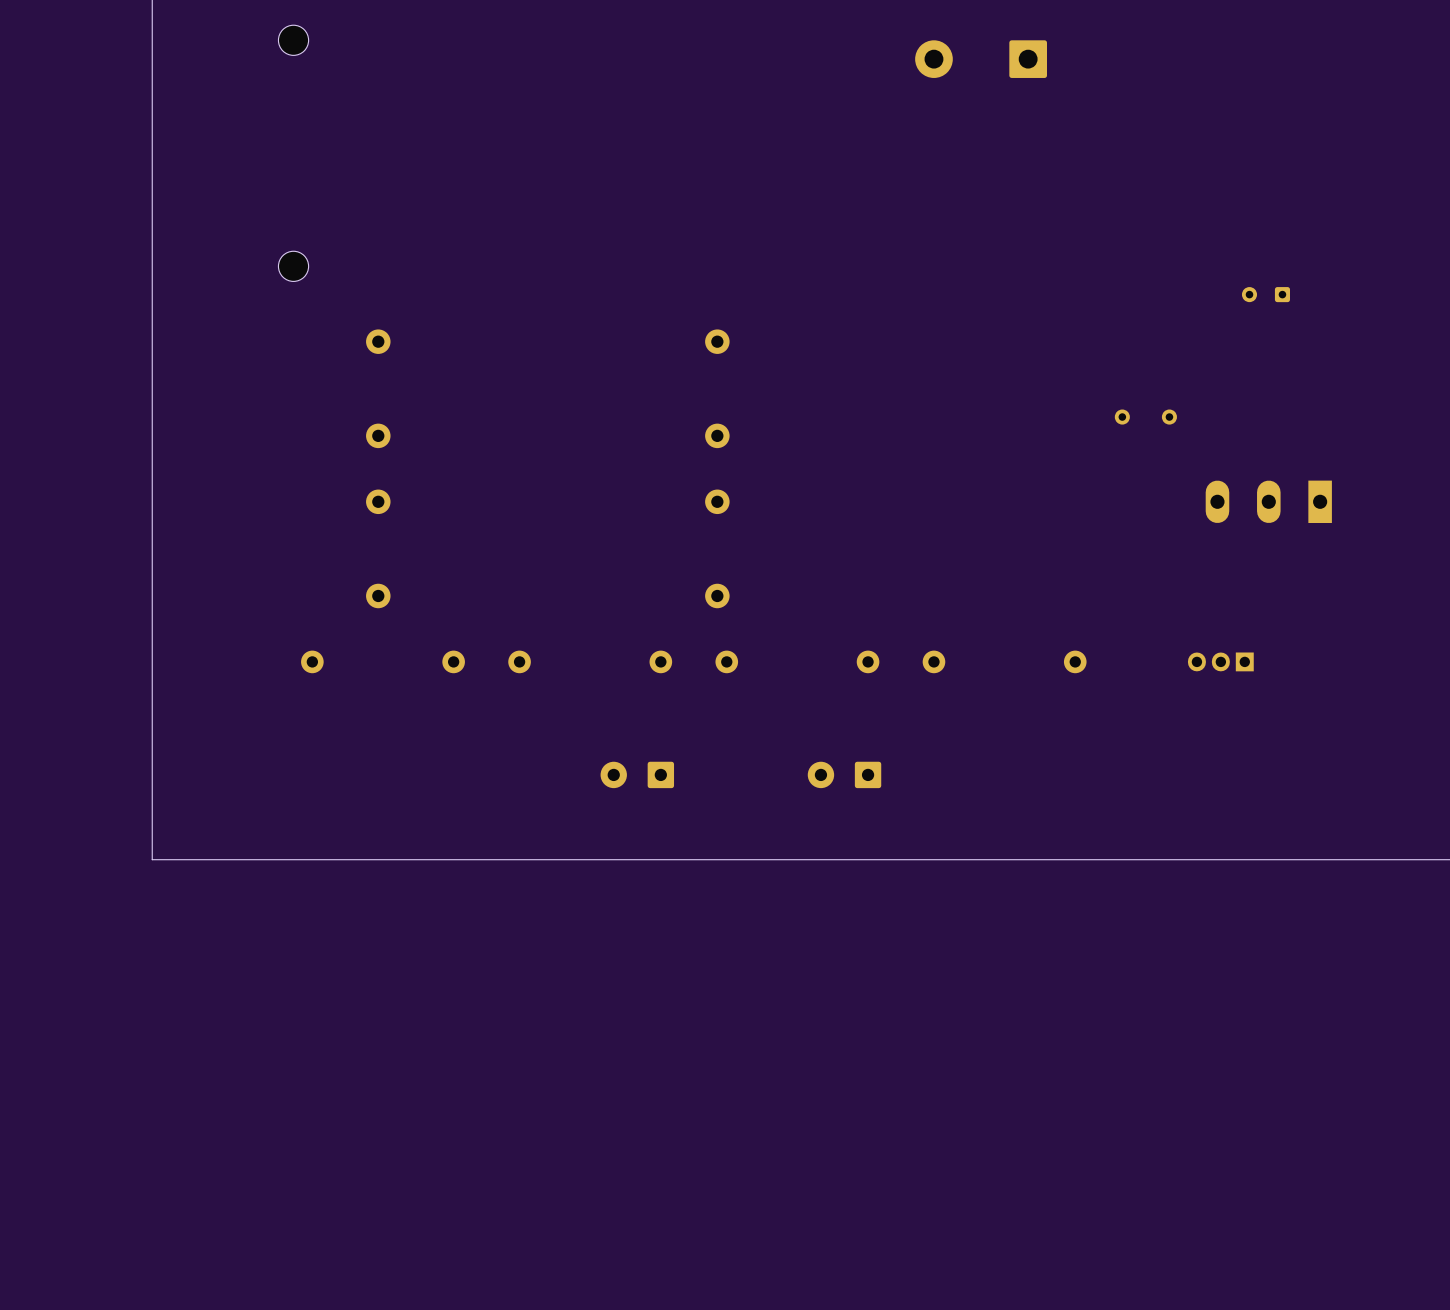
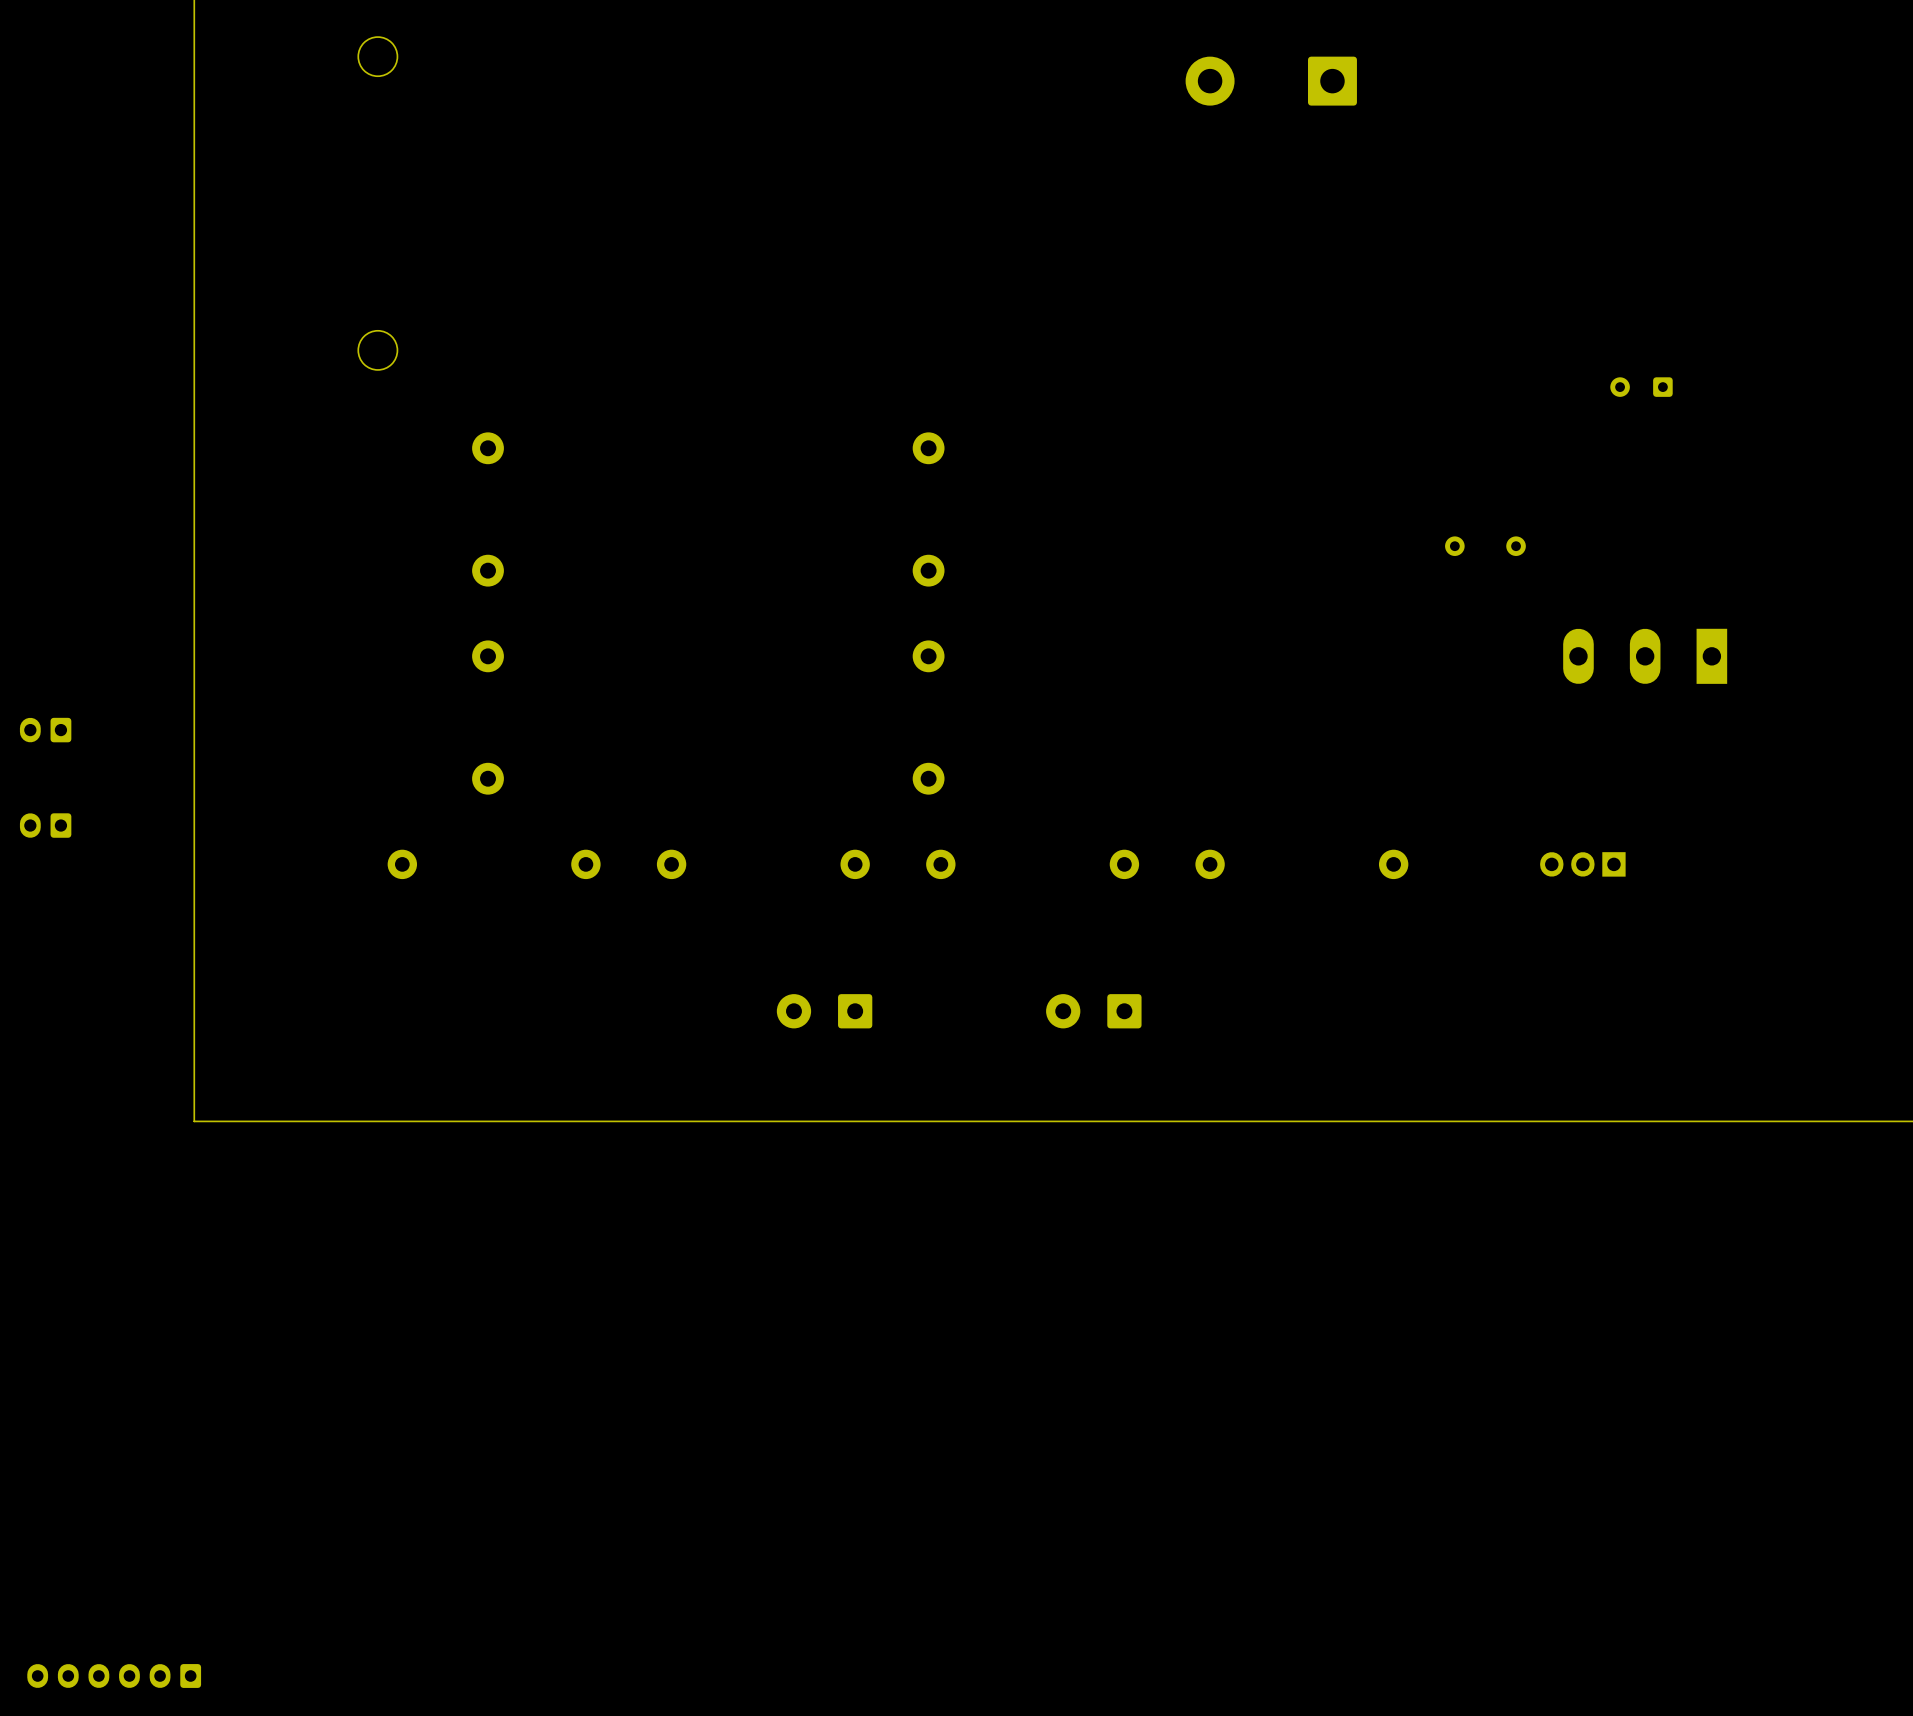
part: none -> (45, 730)
part: none -> (45, 825)
part: none -> (114, 1676)

